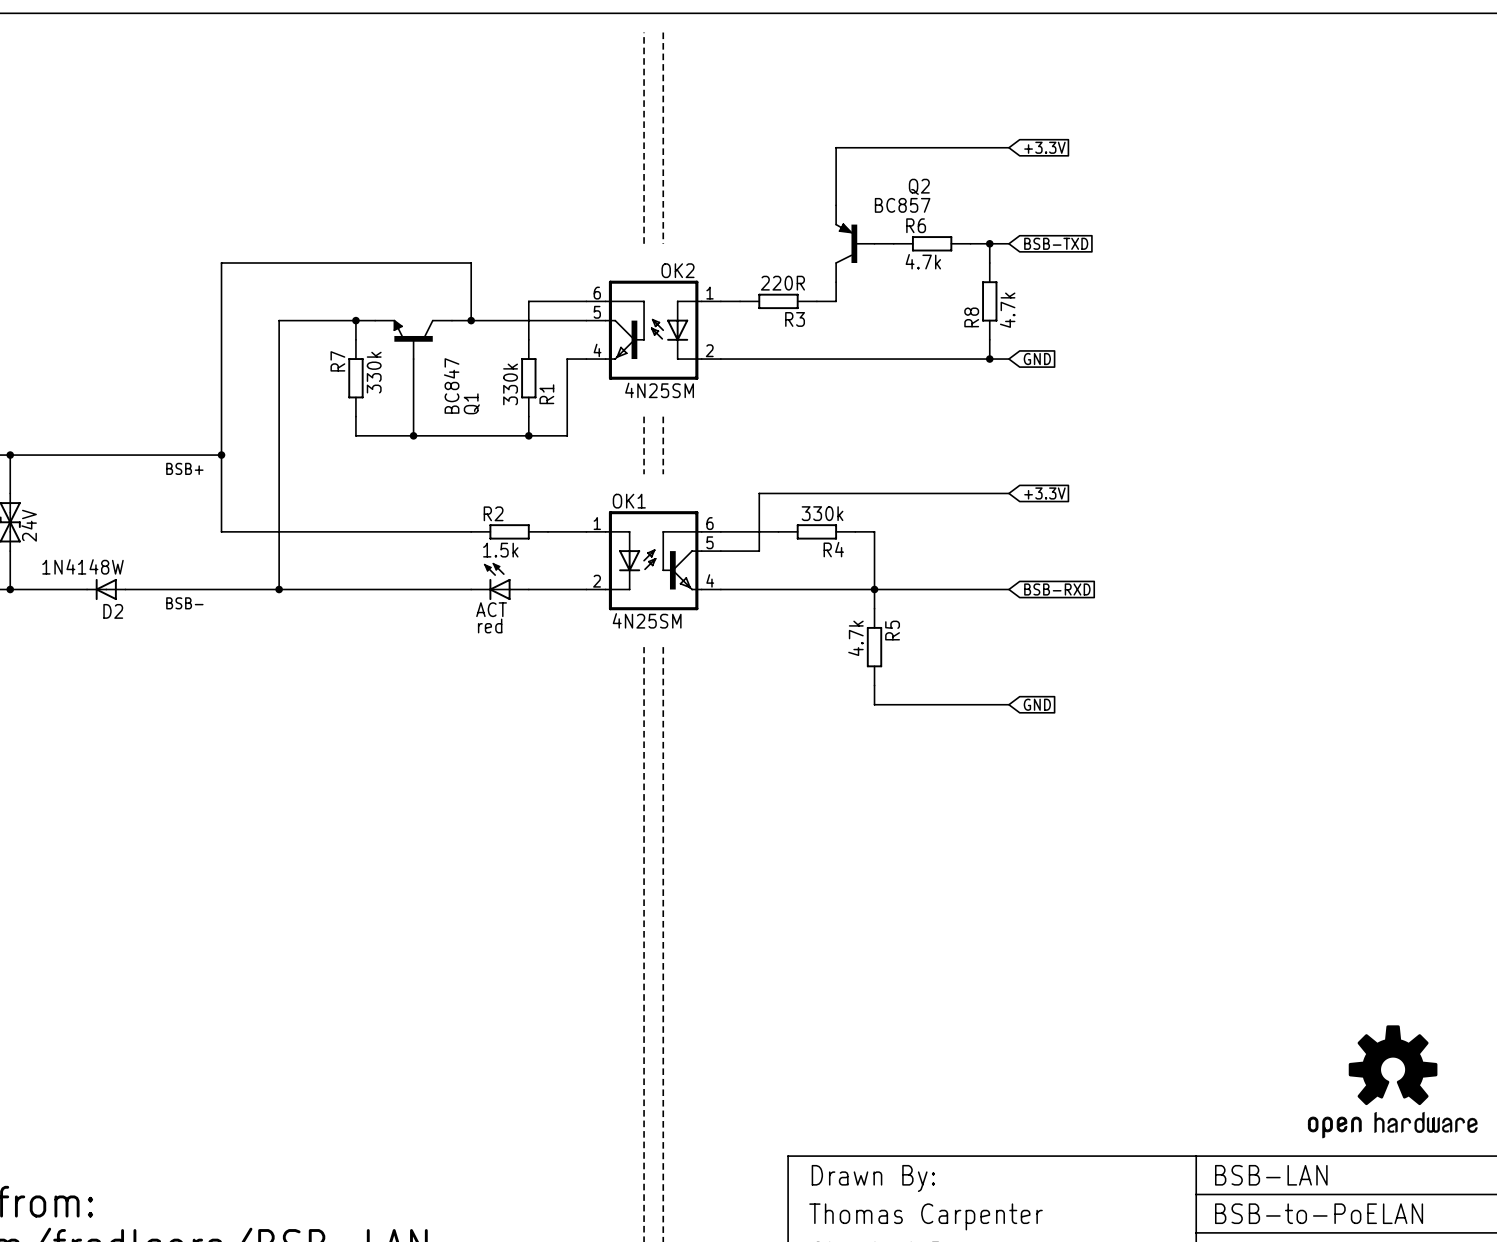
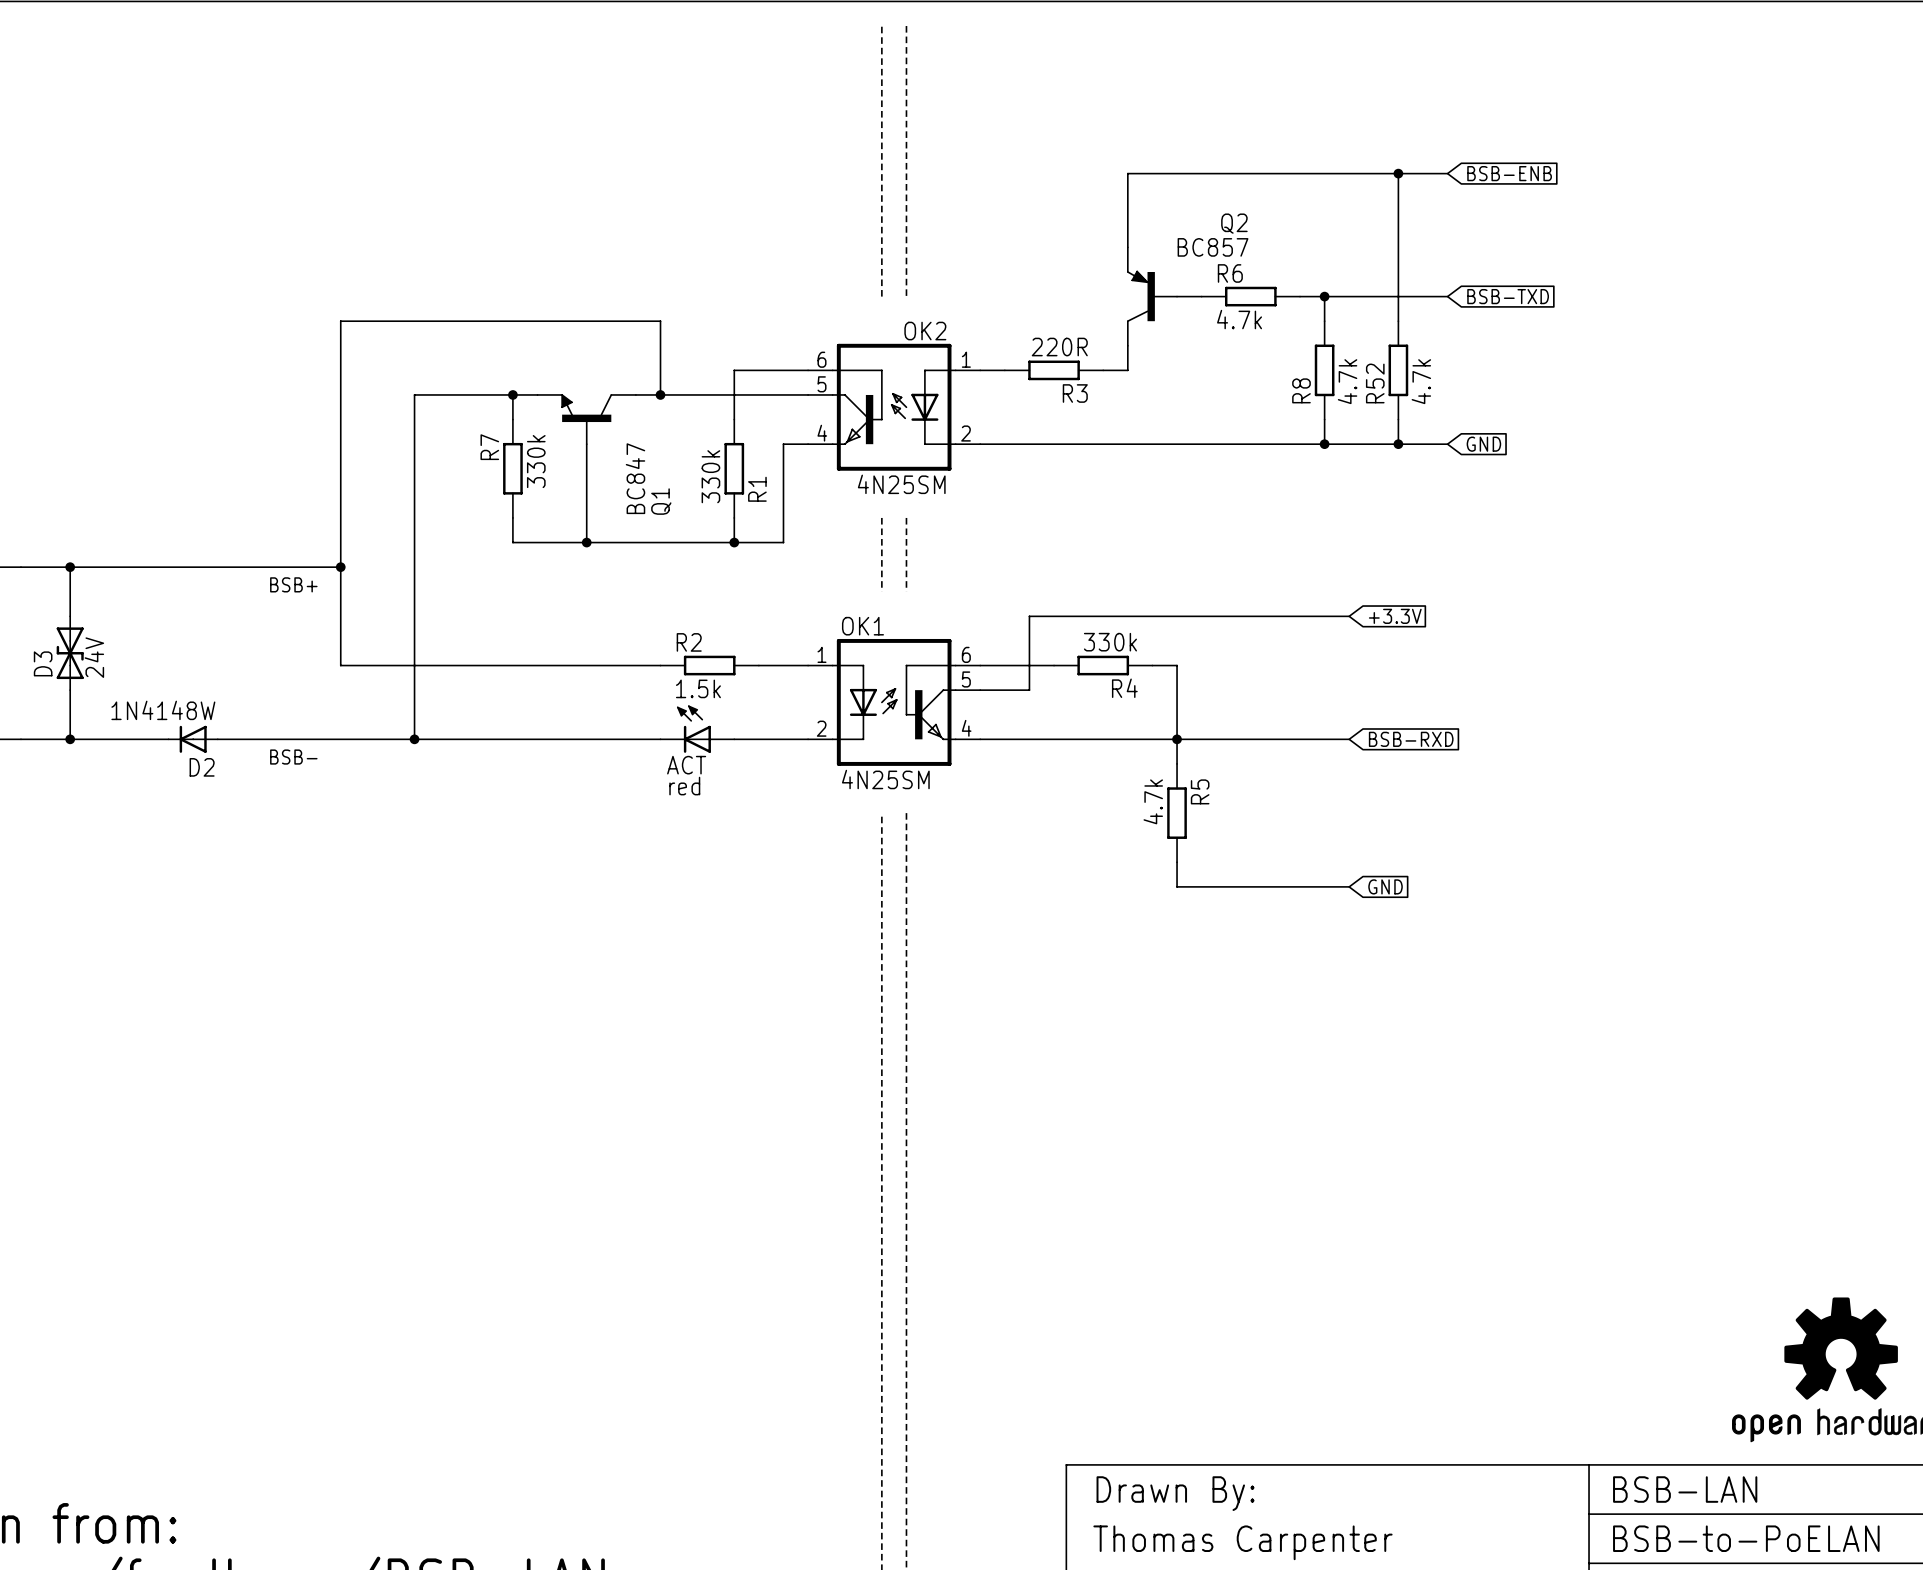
wire: none -> (1349, 173) (1447, 173)
global label: +3.3V (1044, 147) -> none
wire: none -> (1398, 173) (1398, 321)
junction: none -> (1398, 173)
global label: none -> BSB-ENB (1509, 173)
wire: none -> (1349, 296) (1447, 296)
global label position: BSB-TXD (1056, 243) -> BSB-TXD (1508, 296)
R52: none -> 4.7k (1398, 370)
wire: none -> (1398, 419) (1398, 444)
wire: none -> (1349, 444) (1447, 444)
global label position: GND (1037, 359) -> GND (1483, 444)
junction: none -> (1398, 444)

